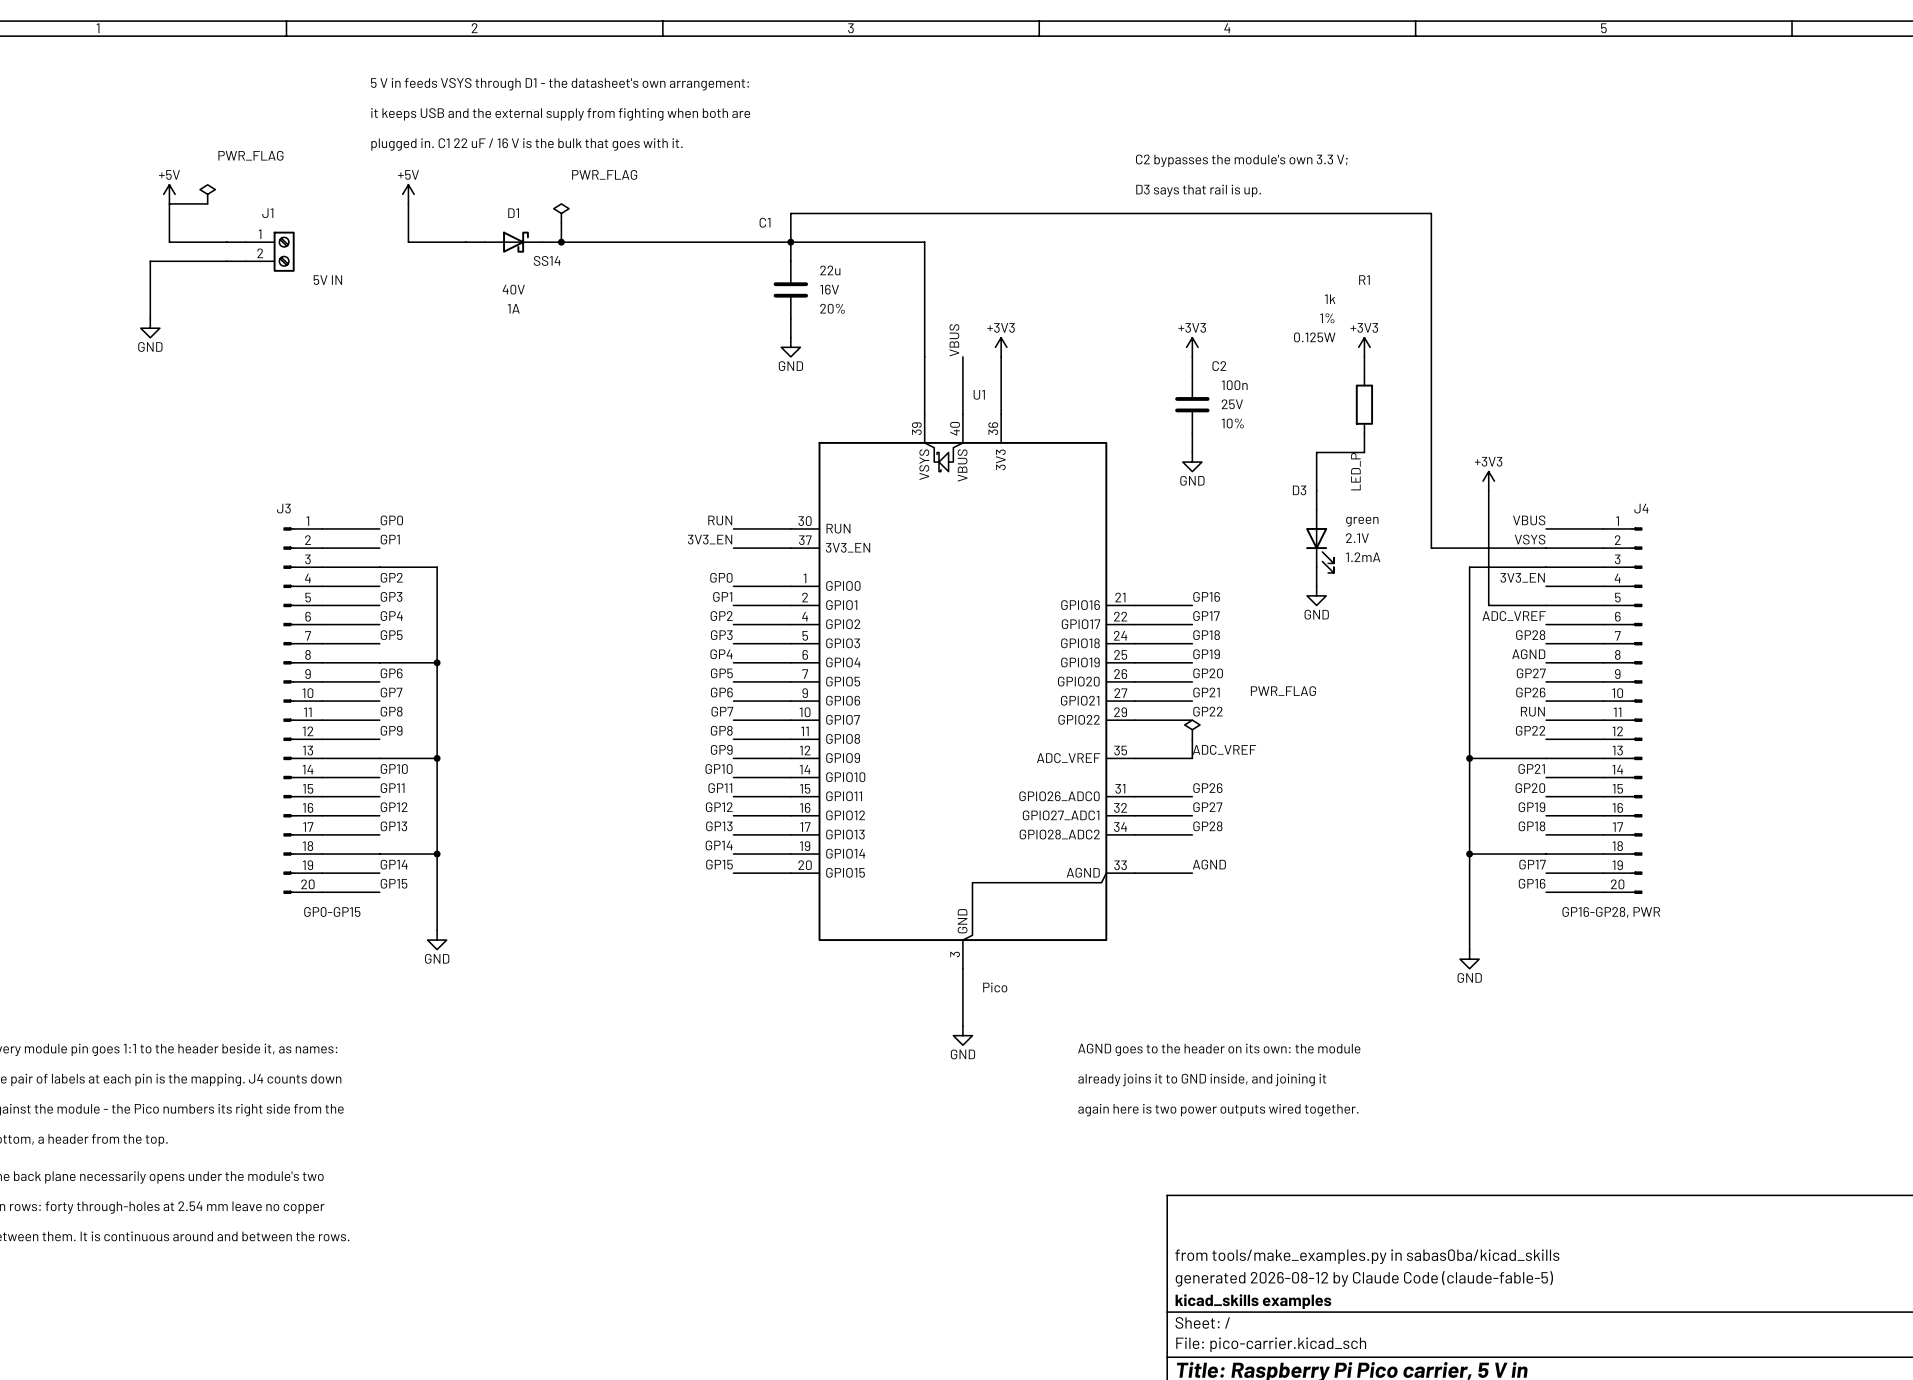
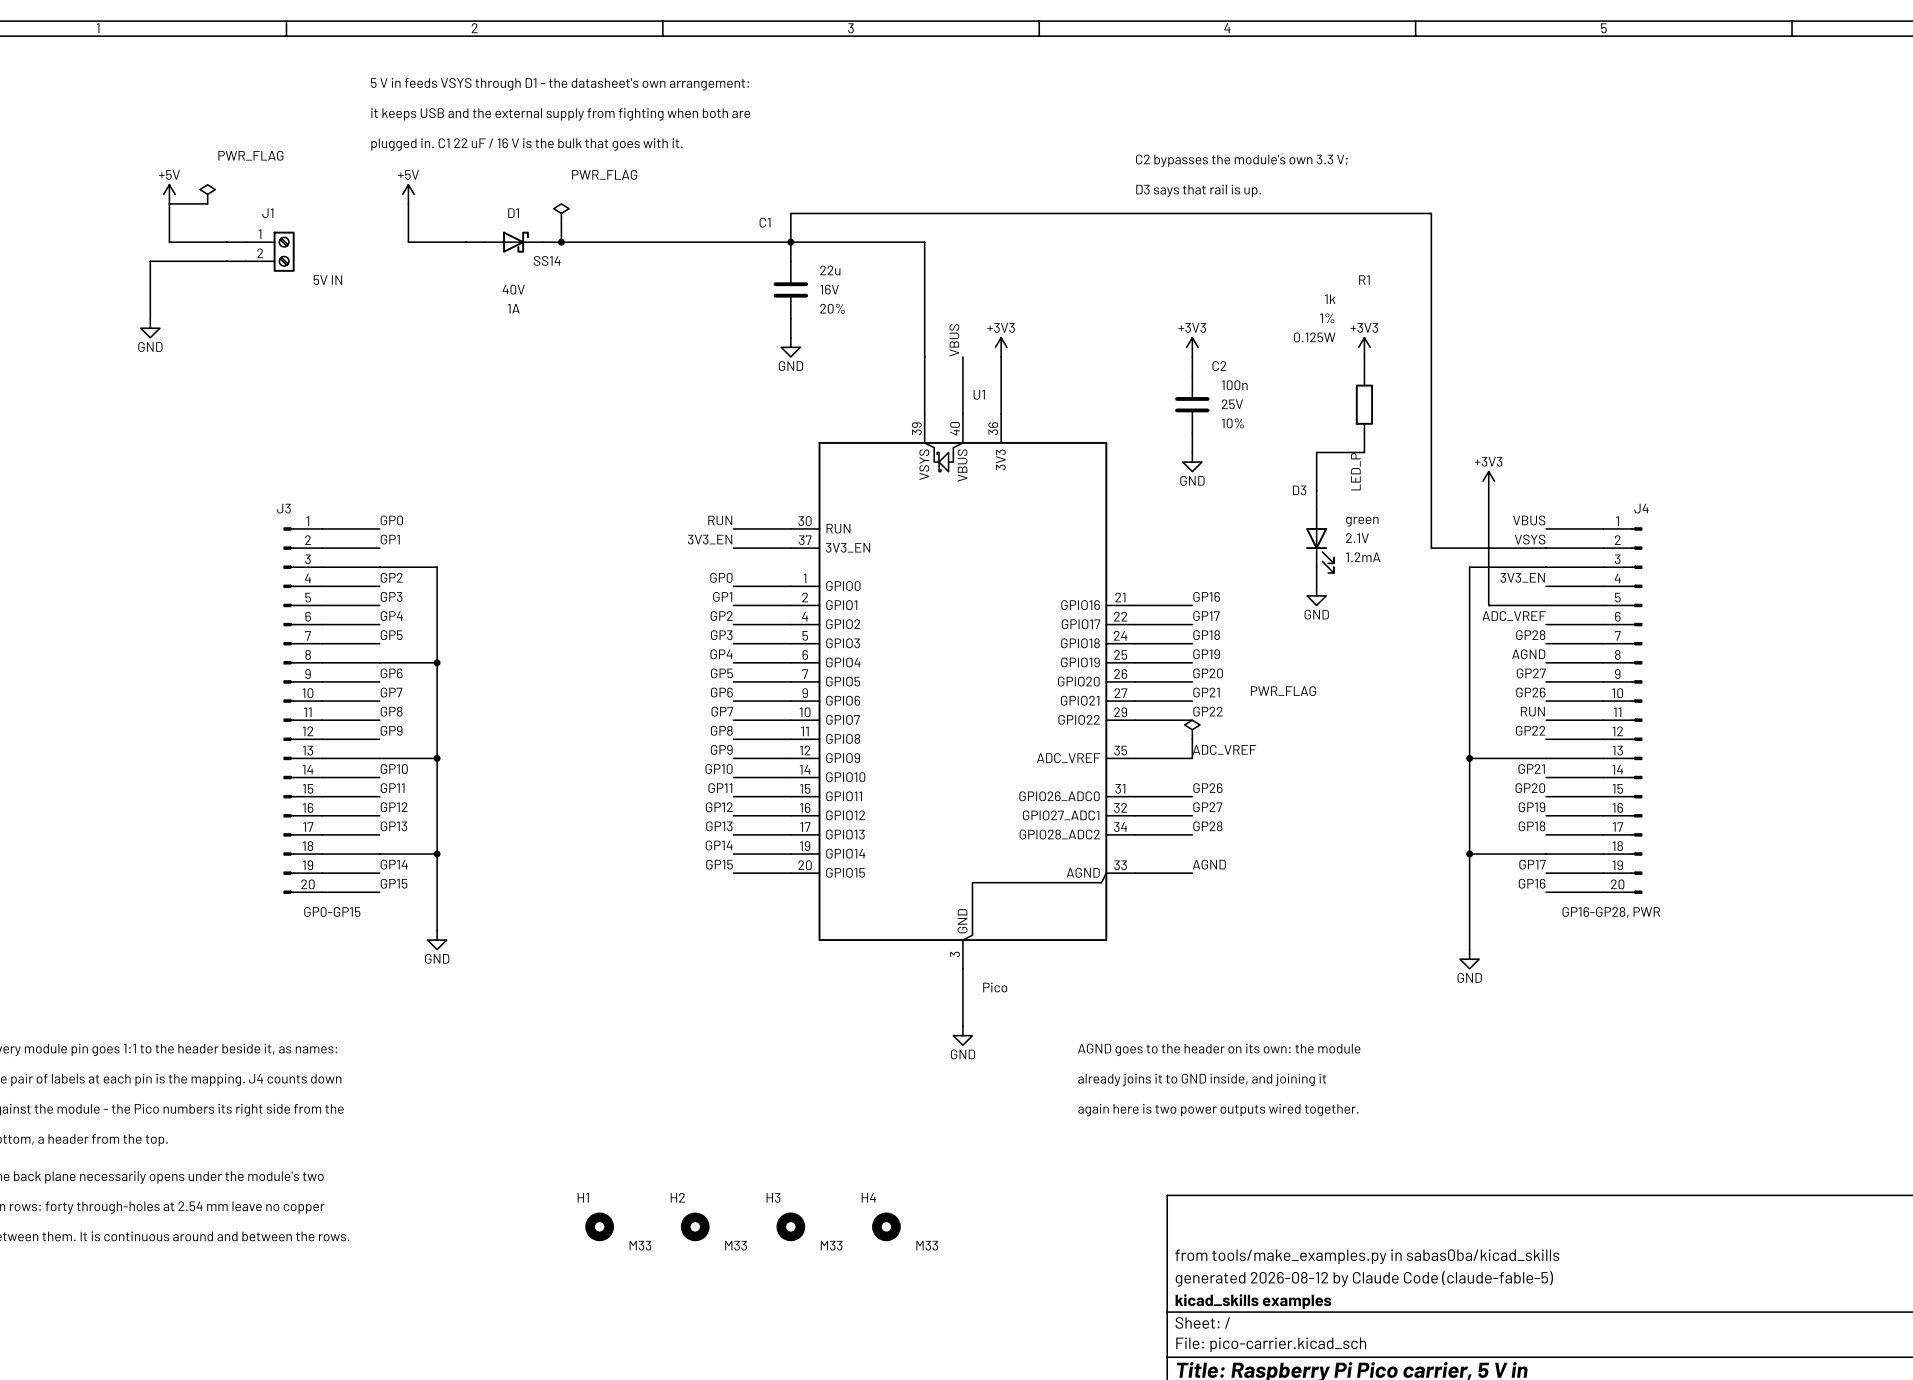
H1: none -> M33 (599, 1226)
H2: none -> M33 (695, 1226)
H3: none -> M33 (790, 1226)
H4: none -> M33 (886, 1226)

